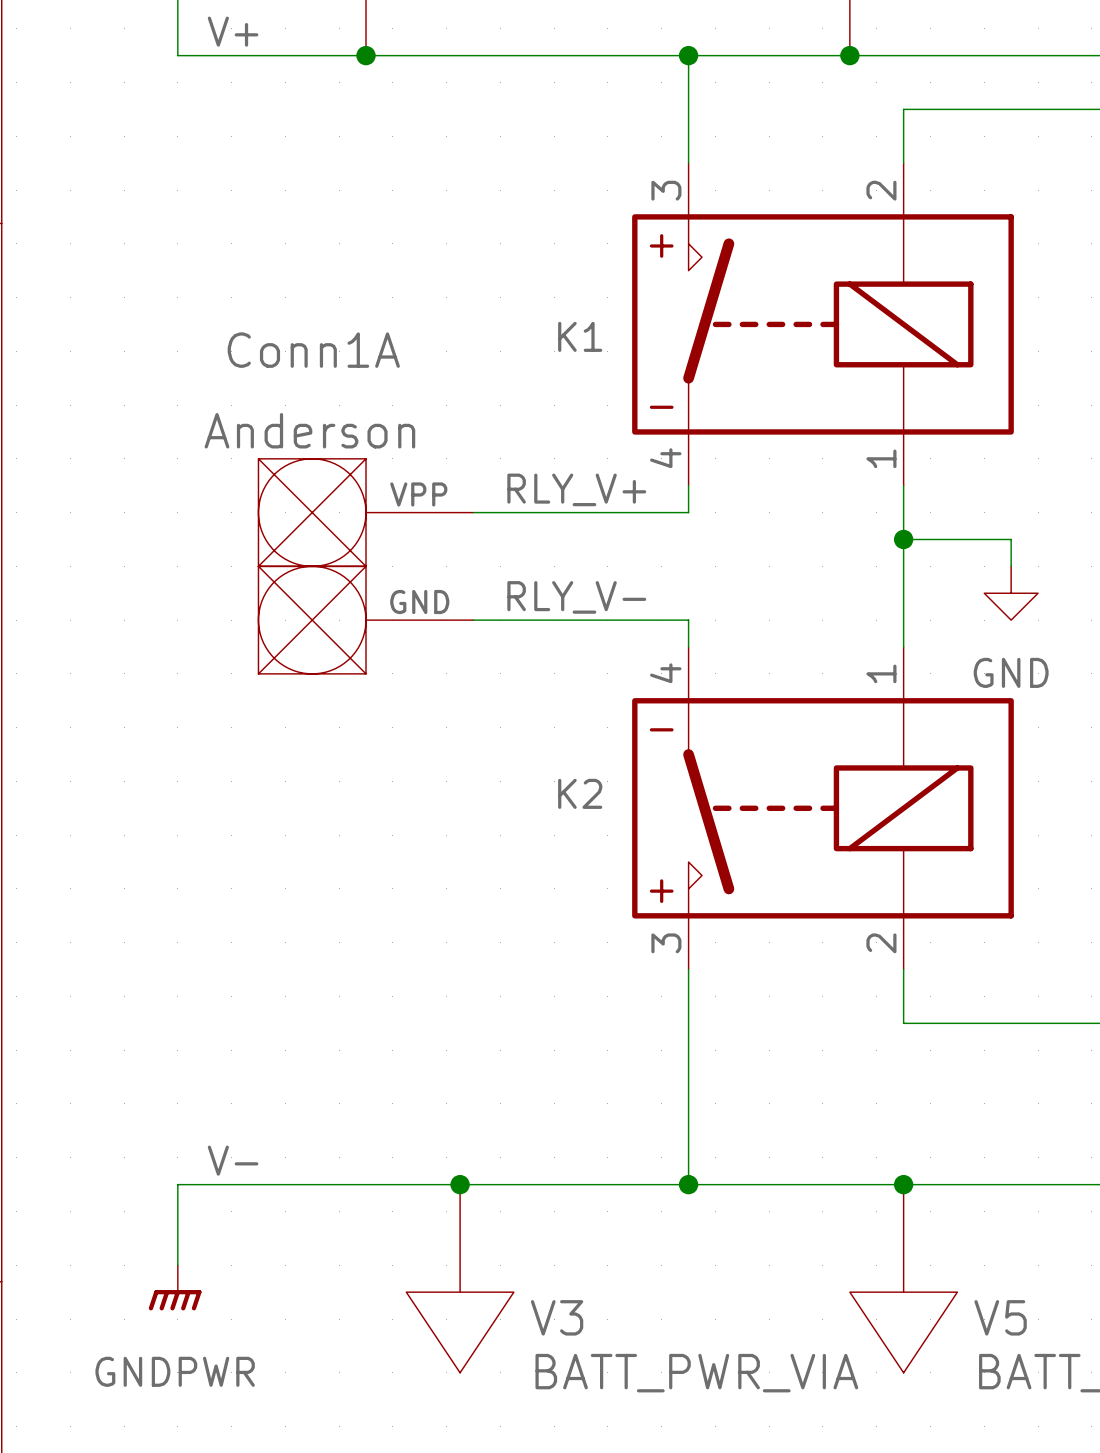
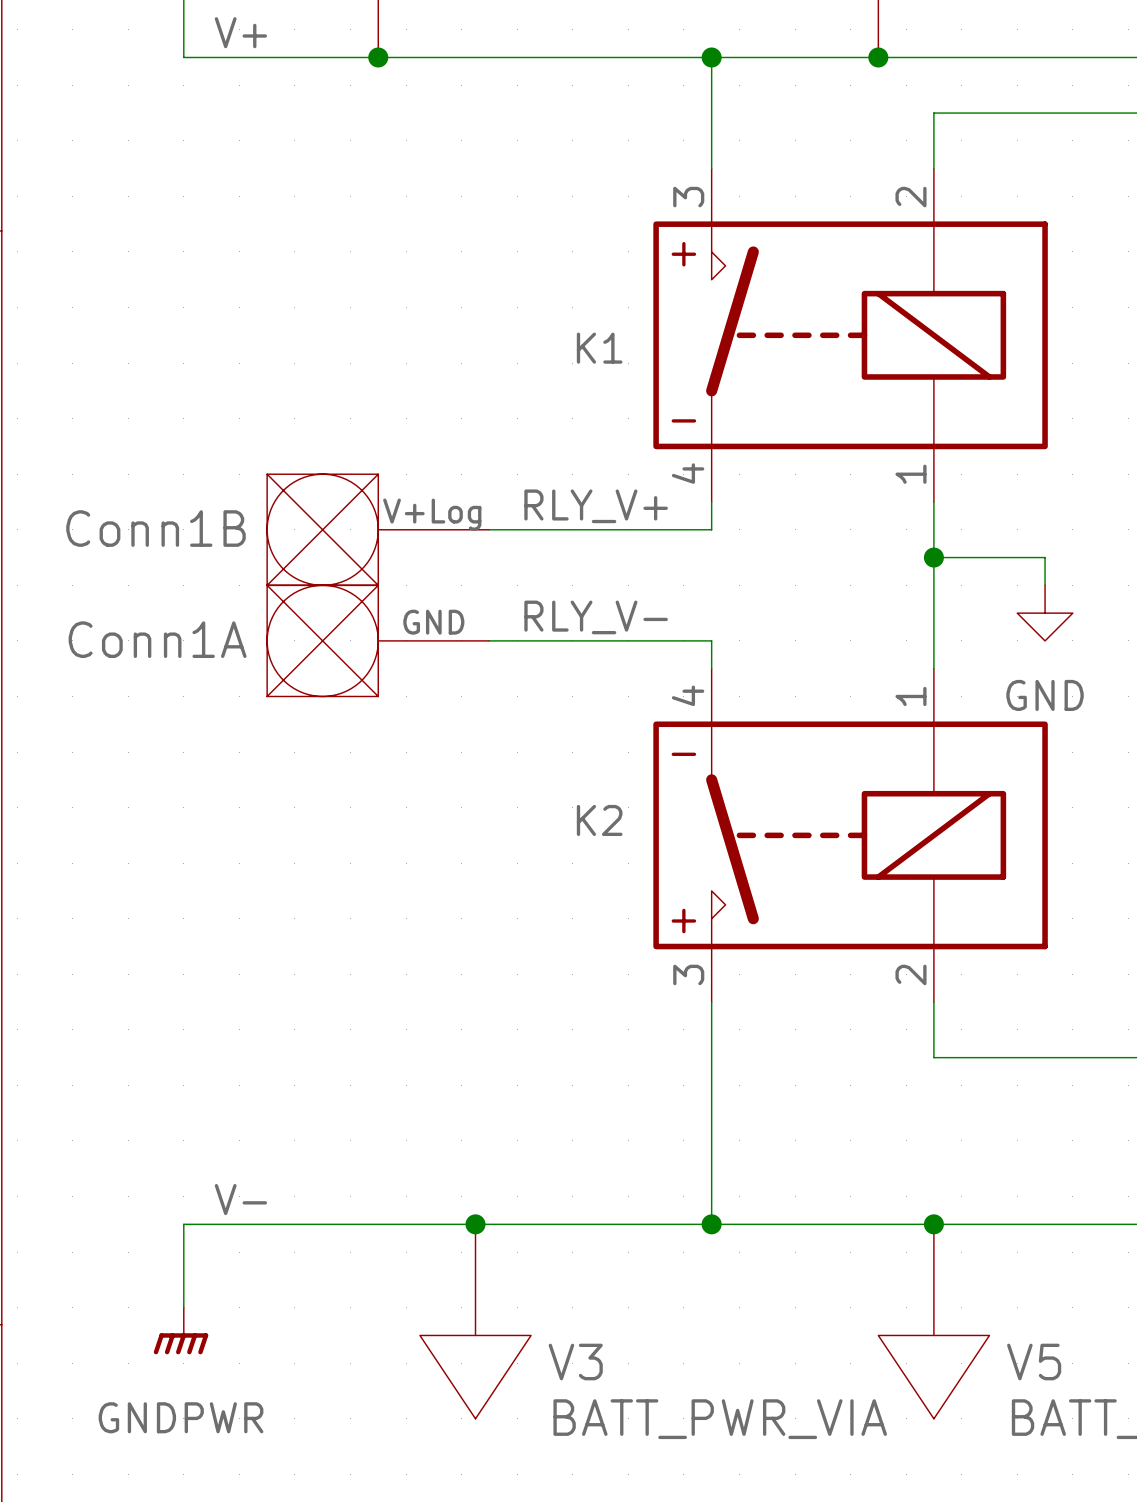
Conn1A name position: Conn1A (313, 350) -> Conn1A (157, 639)
Conn1A value: Anderson (309, 430) -> none
Conn1A symbol: [258, 458, 474, 674] -> [267, 585, 490, 697]
Conn1B: none -> (378, 529)

